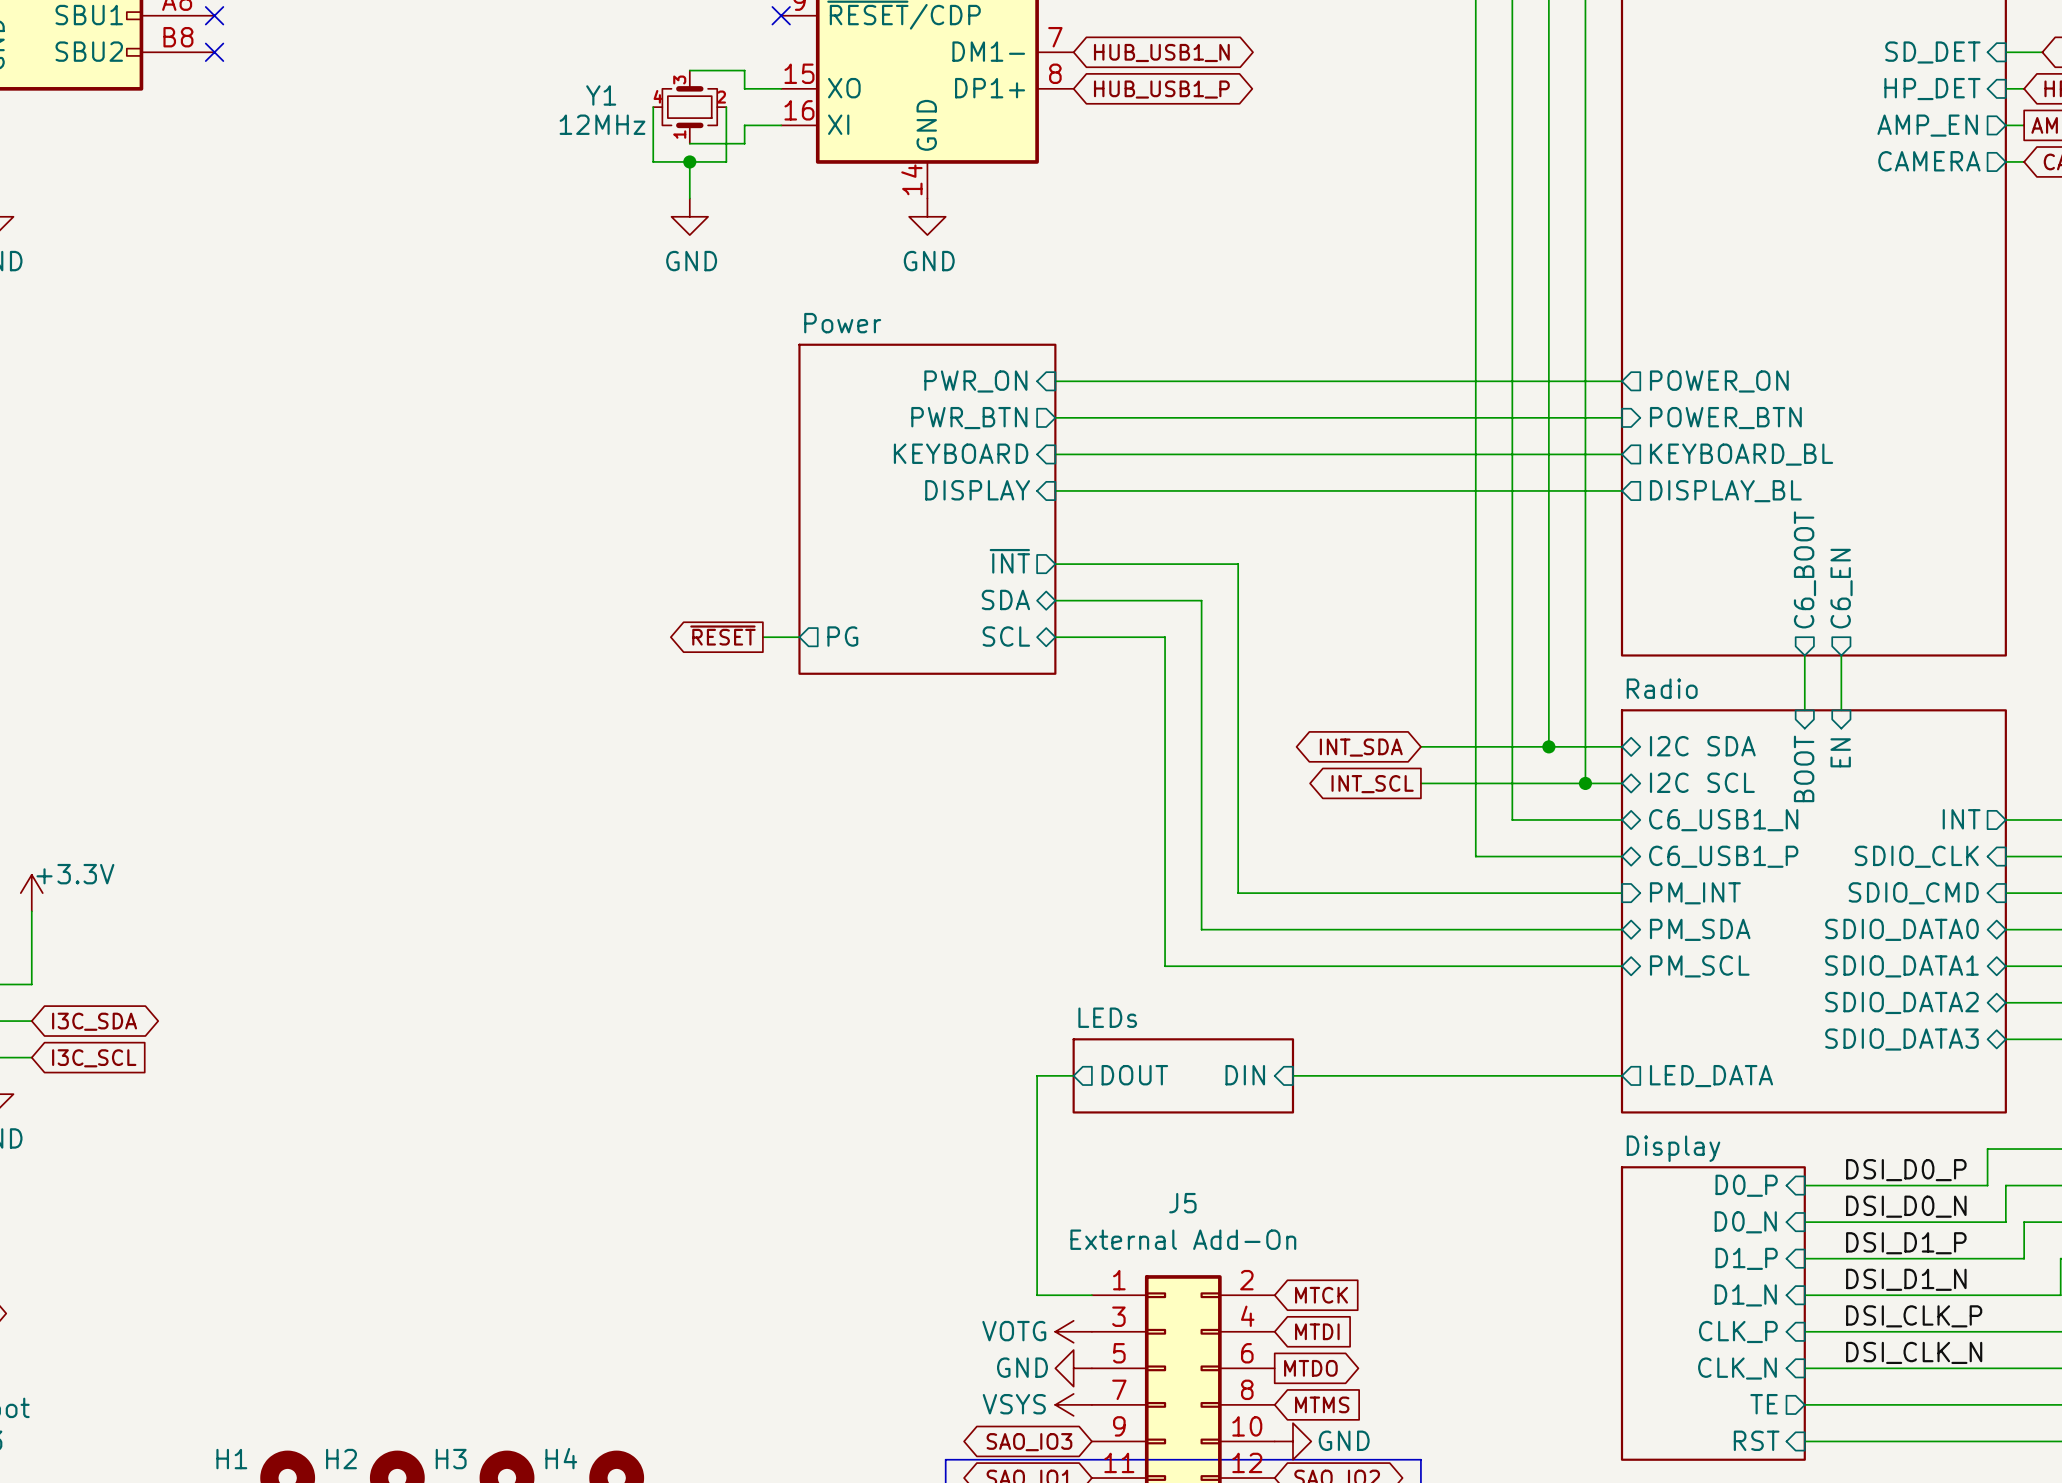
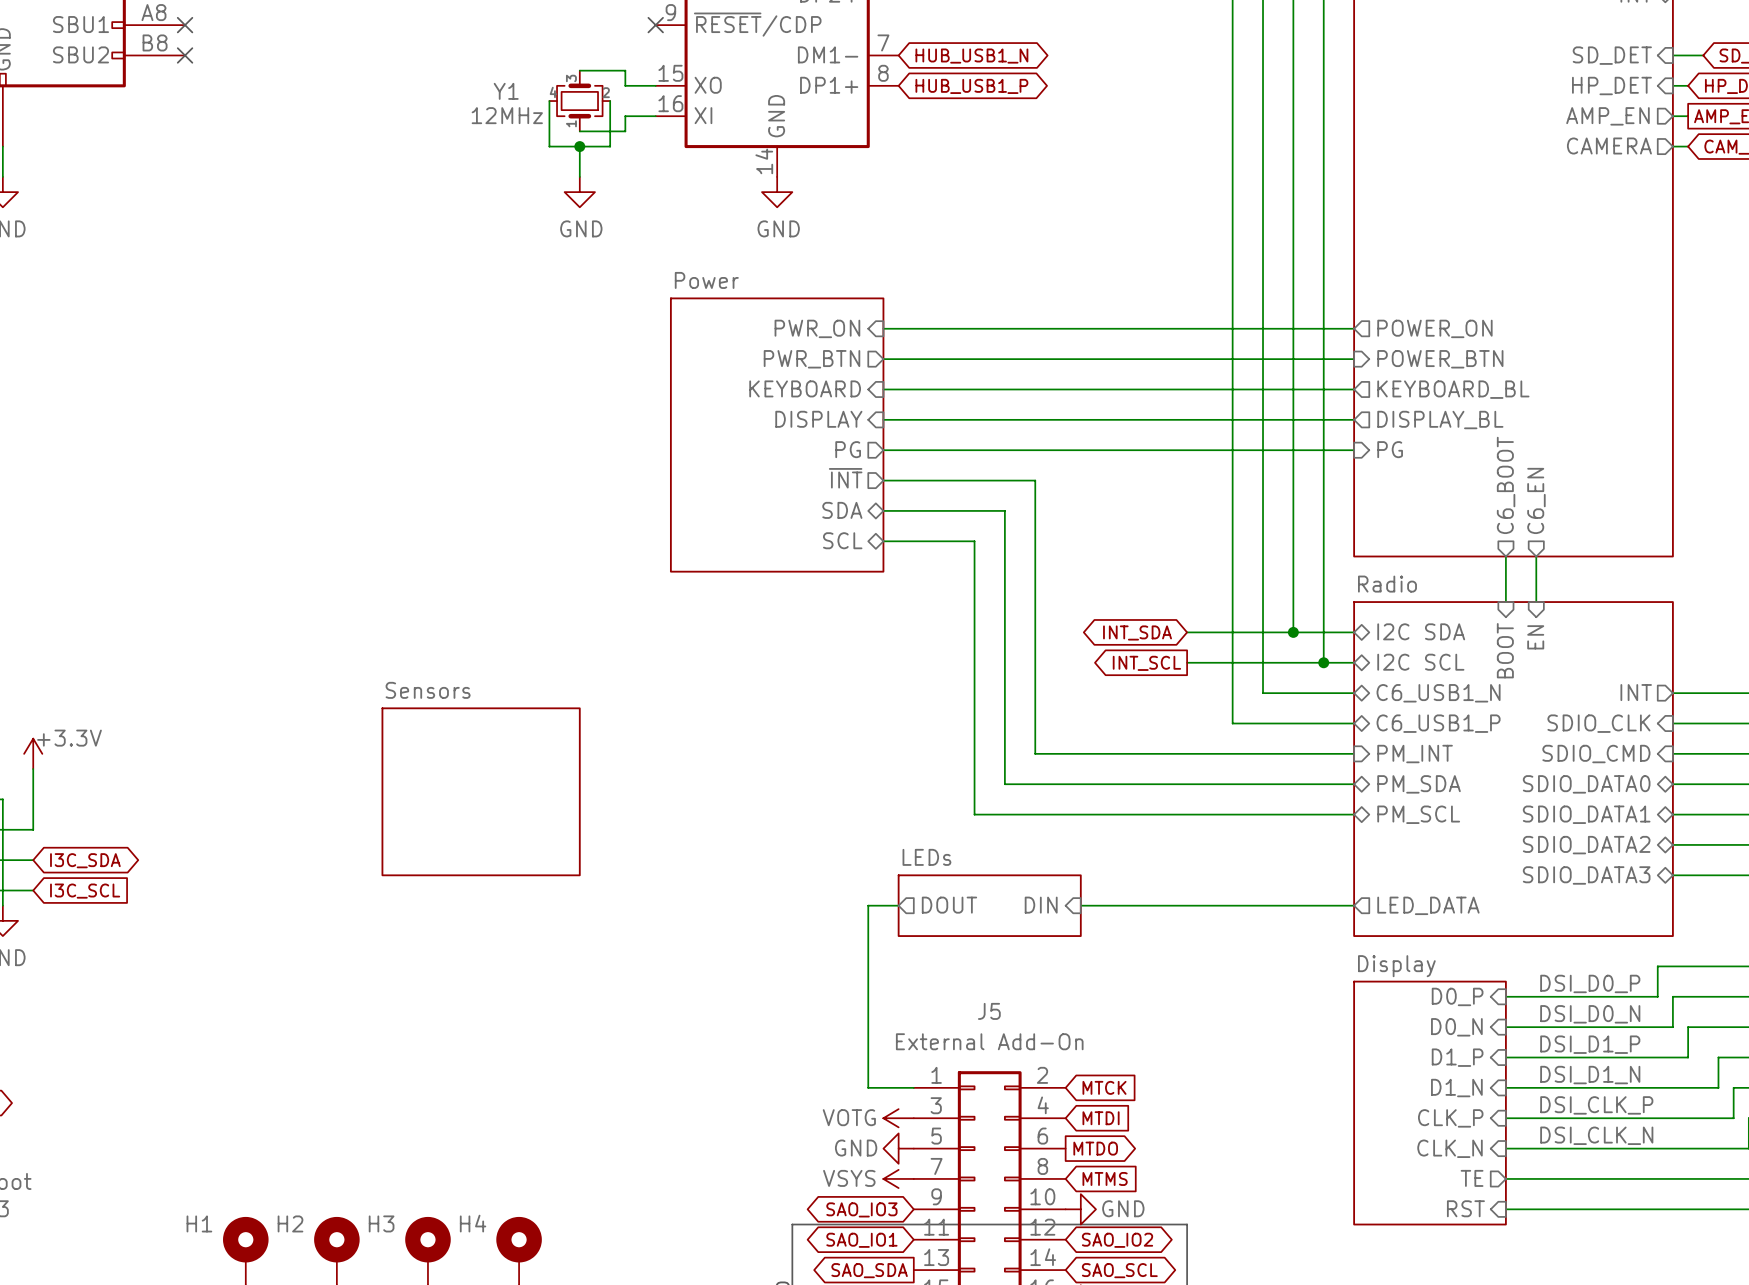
sheet pin: none -> PG (1390, 449)
wire: none -> (883, 450) (1354, 450)
global label: ~{RESET} (722, 635) -> none
sheet pin rotation: 0° (842, 636) -> 180° (848, 449)
sheet pin position: PG (842, 636) -> PG (848, 449)
wire: (762, 637) (799, 637) -> none
sheet Sensors: none -> (481, 791)

